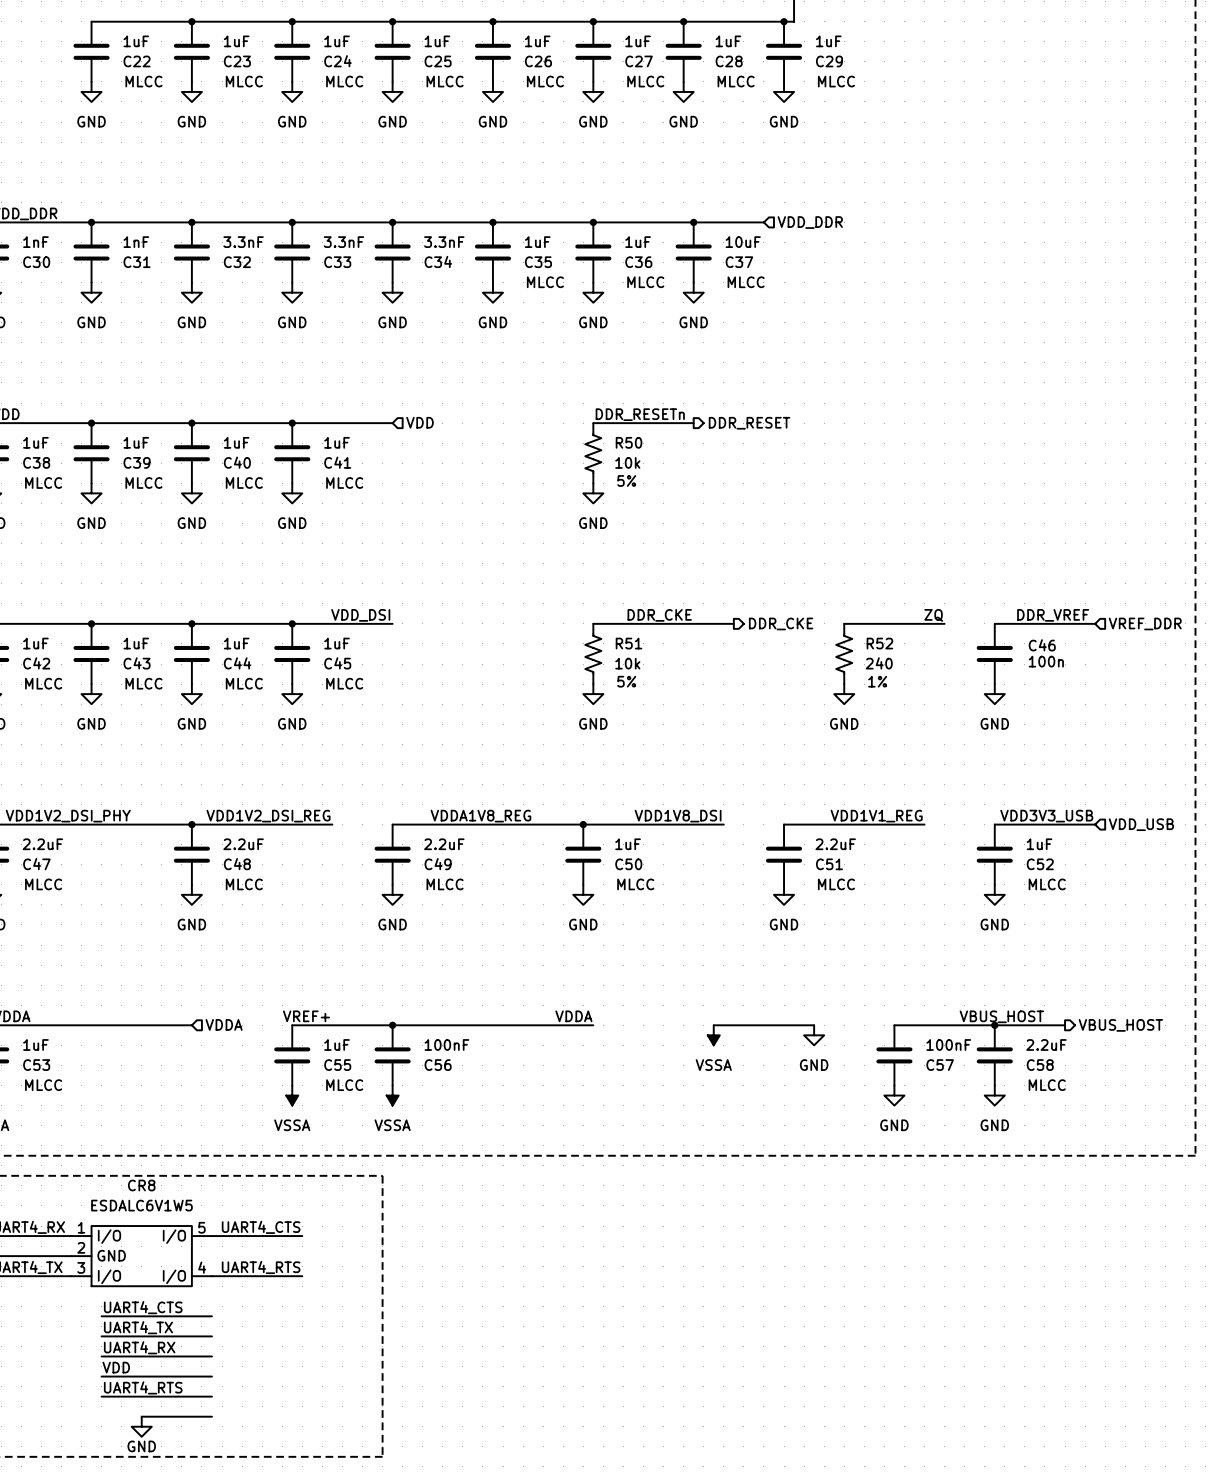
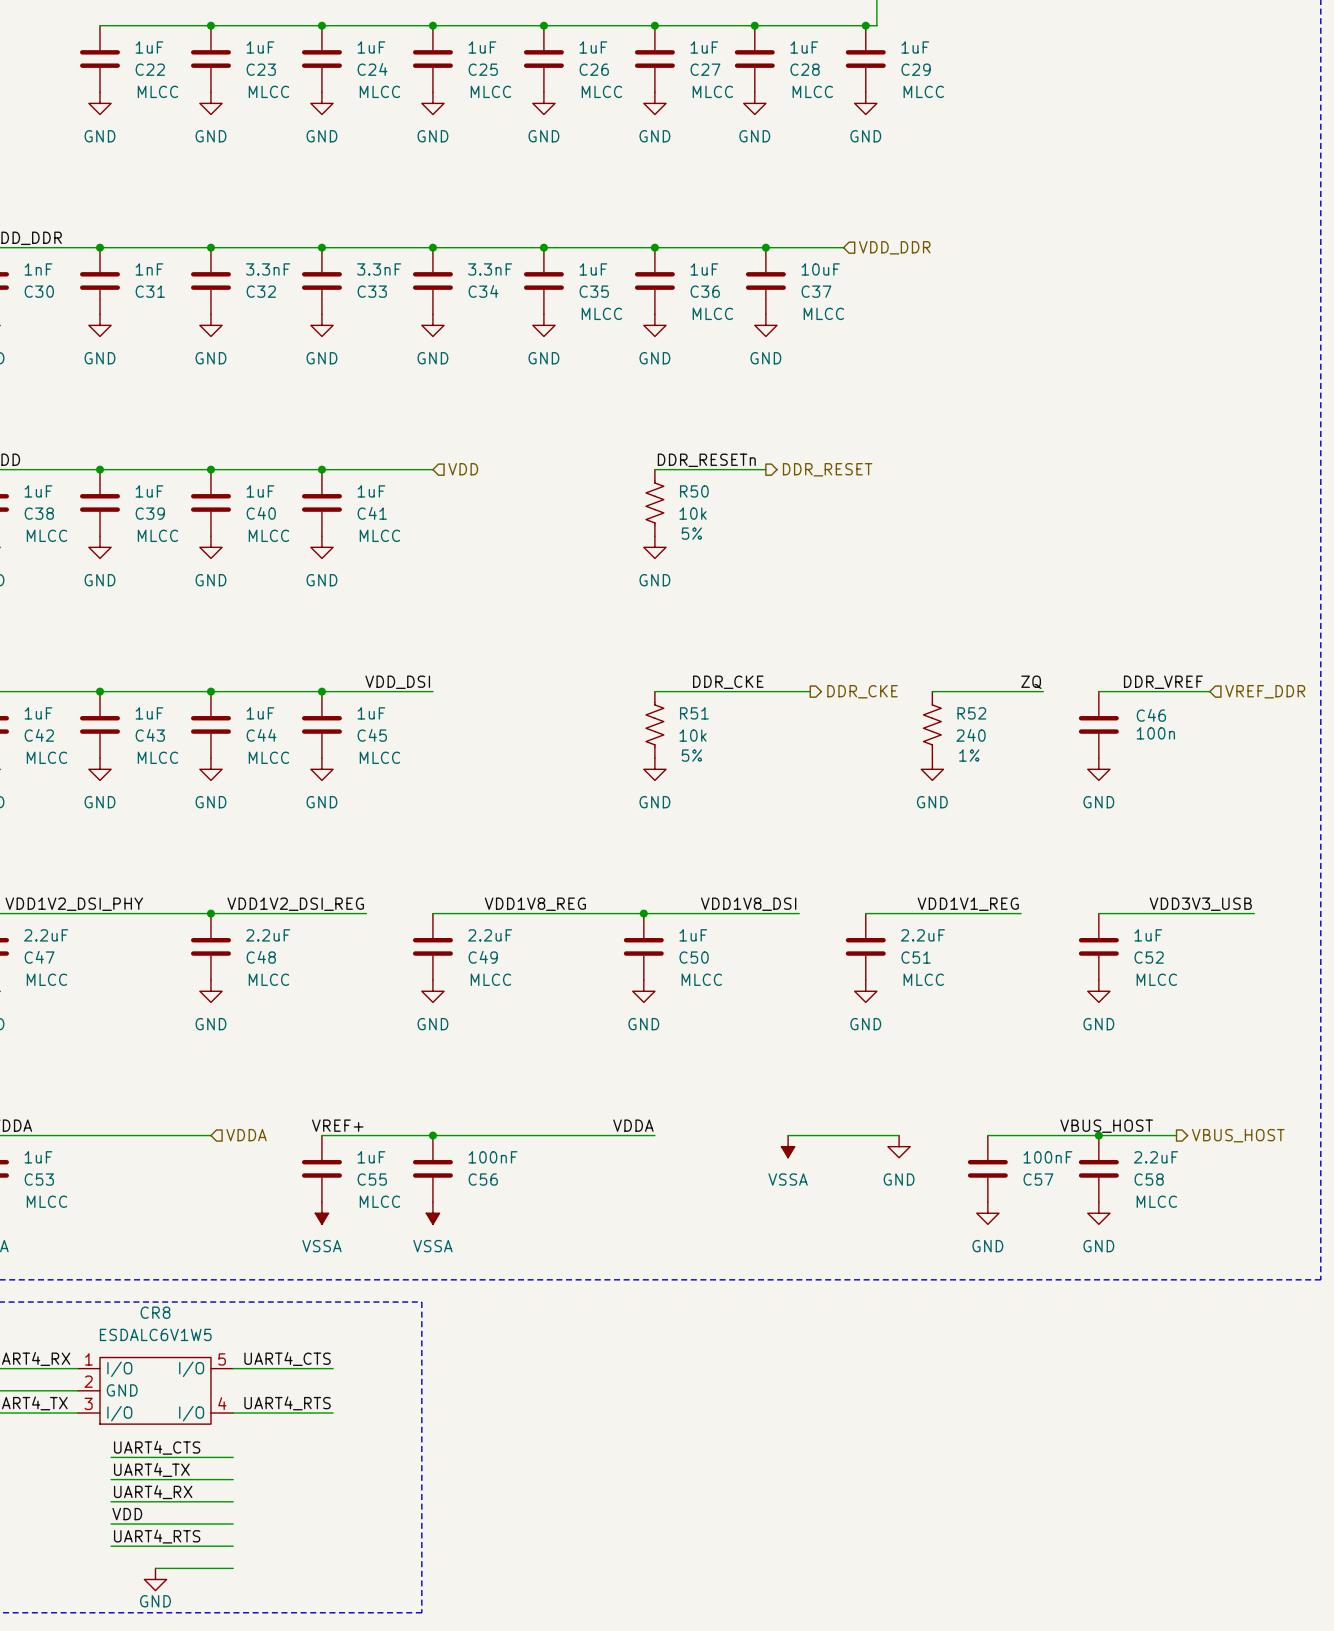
label: VDDA1V8_REG (480, 816) -> VDD1V8_REG (535, 904)
label position: VDD3V3_USB (1046, 816) -> VDD3V3_USB (1200, 904)
wire: none -> (1209, 913) (1254, 913)
hierarchical label: VDD_USB (1141, 824) -> none

